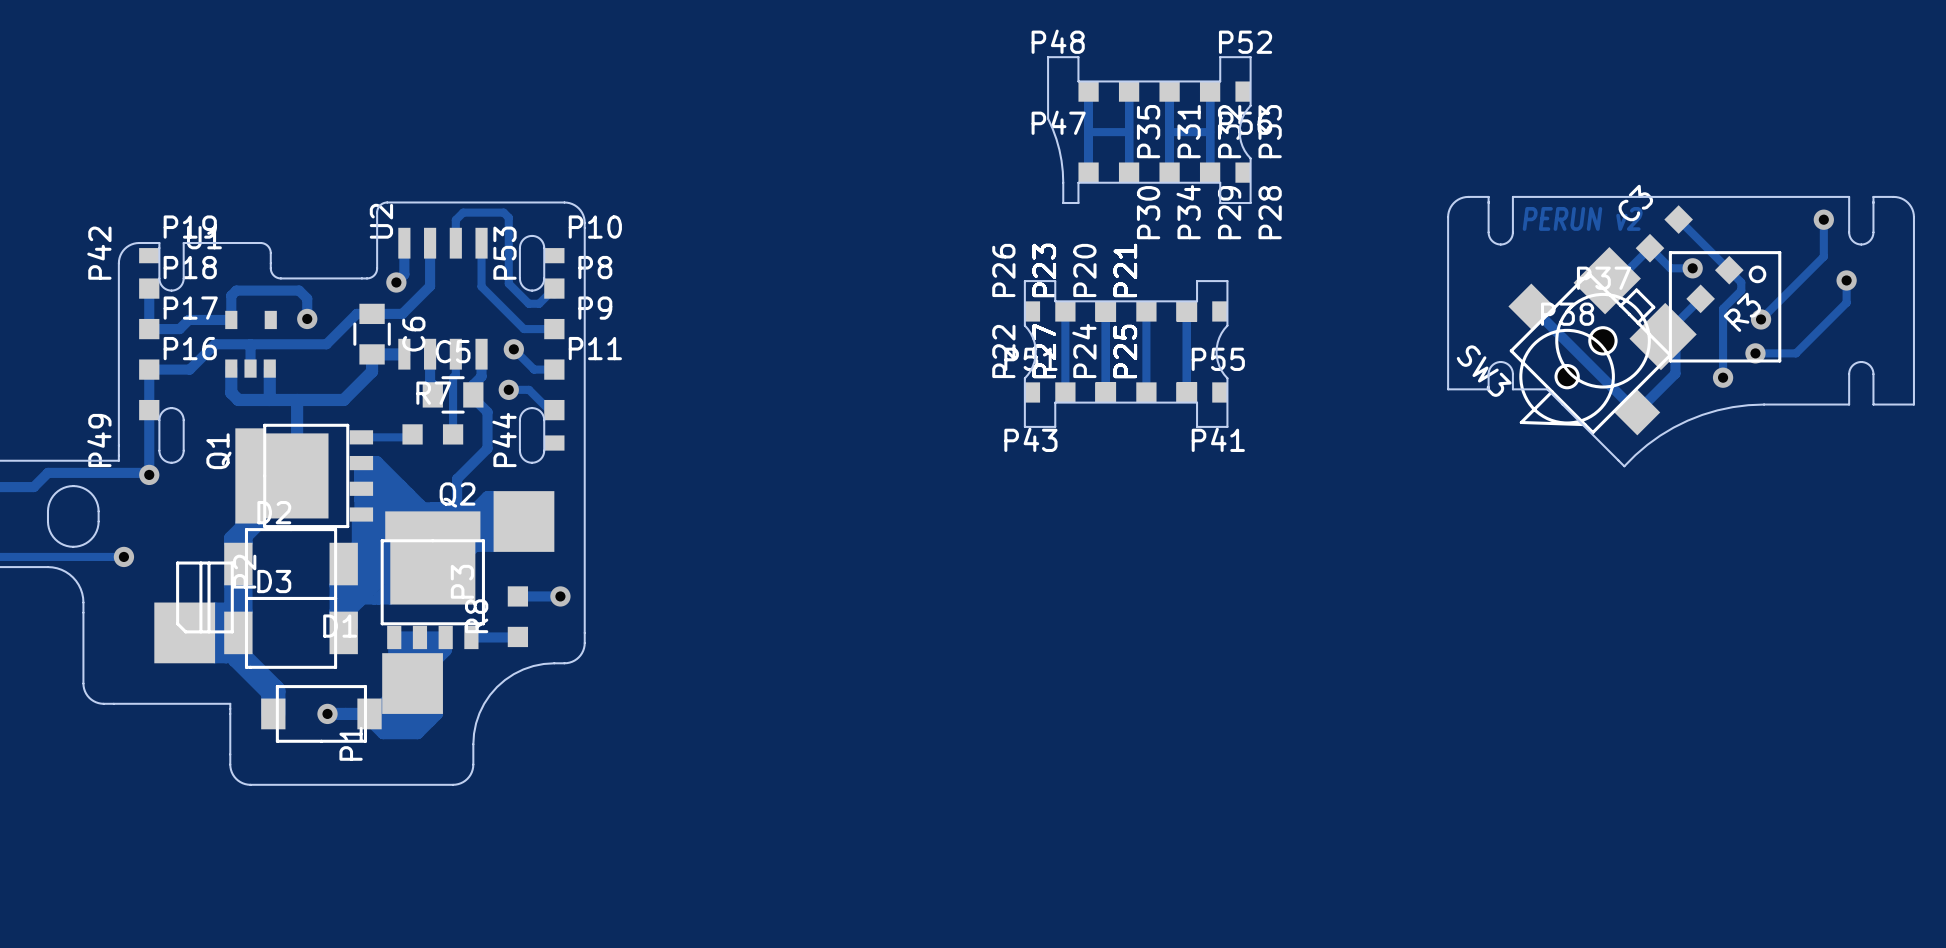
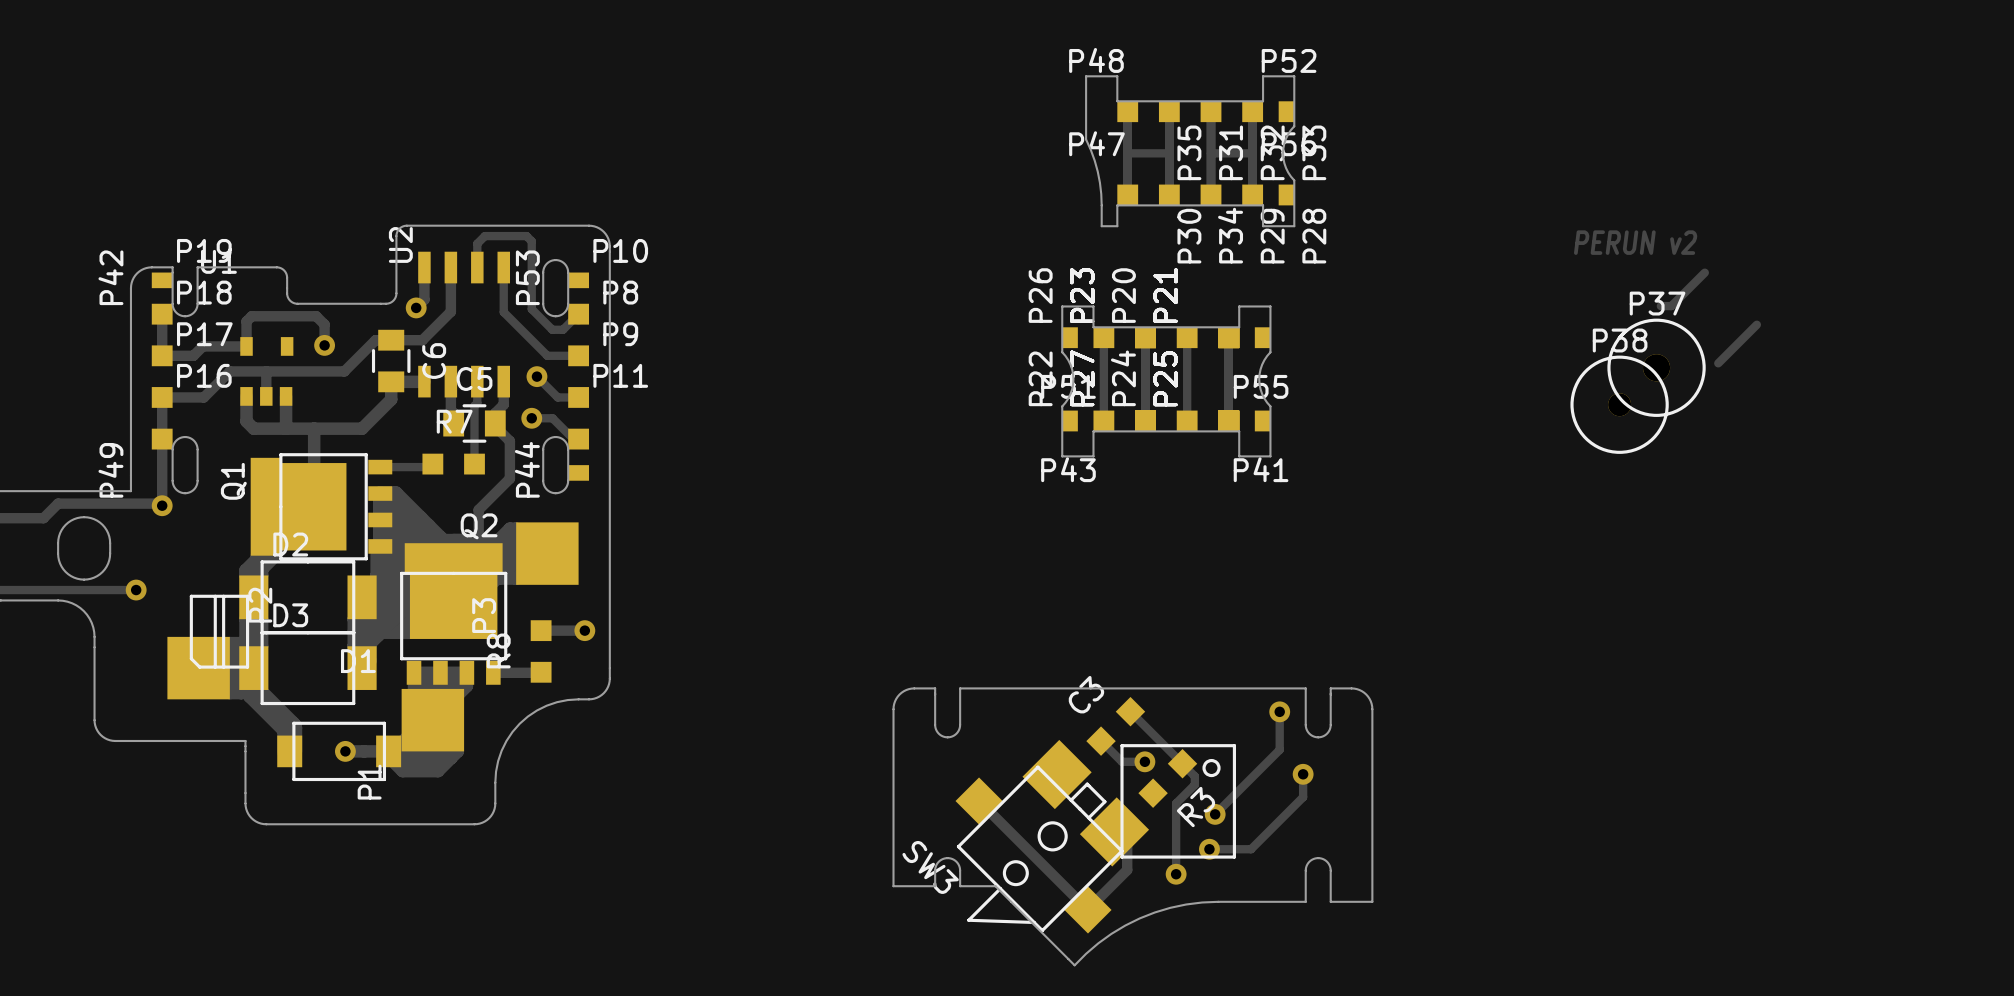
track: (1678, 219) (1729, 270) -> none
track: (1823, 219) (1823, 256) (1761, 319) -> none
via: (1823, 219) -> none
C3 position: (1664, 233) -> (1115, 726)
board edge: (1500, 244) (1508, 242) (1512, 235) (1512, 196) (1849, 196) (1849, 235) (1853, 242) (1861, 244) -> none
board edge: (1500, 244) (1493, 242) (1489, 235) (1488, 196) (1463, 197) (1452, 204) (1448, 217) (1448, 389) (1488, 389) (1490, 368) (1496, 362) (1505, 362) (1512, 371) (1512, 389) (1547, 389) (1624, 466) -> none
board edge: (1861, 244) (1868, 242) (1873, 235) (1873, 196) (1898, 197) (1909, 204) (1913, 217) (1913, 404) (1873, 404) (1872, 369) (1865, 362) (1858, 362) (1852, 365) (1849, 371) (1849, 404) (1748, 405) (1717, 410) (1673, 427) (1647, 444) (1624, 466) -> none
track: (1650, 248) (1670, 268) (1692, 268) -> none
via: (1692, 268) -> none
track: (1729, 270) (1741, 282) (1741, 290) (1723, 308) (1723, 377) -> none
track: (1846, 280) (1846, 302) (1795, 353) (1755, 353) -> none
via: (1846, 280) -> none
R3 position: (1714, 284) -> (1167, 778)
part: (1725, 306) -> none
track: (1532, 307) (1636, 411) (1675, 373) (1675, 348) (1663, 336) -> none
via: (1761, 319) -> none
SW3 position: (1602, 341) -> (1052, 836)
via: (1755, 353) -> none
via: (1723, 377) -> none
track: none -> (1130, 711) (1182, 763)
track: none -> (1279, 711) (1279, 749) (1215, 814)
via: none -> (1279, 711)
board edge: none -> (947, 737) (955, 734) (959, 728) (960, 688) (1305, 688) (1306, 728) (1310, 734) (1318, 737)
board edge: none -> (947, 737) (940, 734) (935, 728) (935, 688) (908, 689) (897, 696) (893, 709) (893, 886) (935, 886) (936, 864) (942, 859) (952, 859) (959, 867) (960, 886) (995, 886) (1074, 965)
board edge: none -> (1318, 737) (1325, 734) (1330, 728) (1330, 688) (1356, 689) (1368, 696) (1372, 709) (1372, 901) (1330, 901) (1329, 865) (1323, 859) (1315, 858) (1309, 861) (1306, 867) (1305, 901) (1202, 902) (1170, 907) (1125, 925) (1098, 943) (1074, 965)
track: none -> (1101, 741) (1122, 761) (1144, 761)
via: none -> (1144, 761)
track: none -> (1182, 764) (1194, 776) (1194, 784) (1176, 803) (1176, 874)
track: none -> (1303, 774) (1303, 797) (1251, 849) (1209, 849)
via: none -> (1303, 774)
track: none -> (979, 801) (1087, 909) (1127, 870) (1127, 844) (1114, 831)
part: none -> (1178, 801)
via: none -> (1215, 814)
via: none -> (1209, 849)
via: none -> (1176, 874)

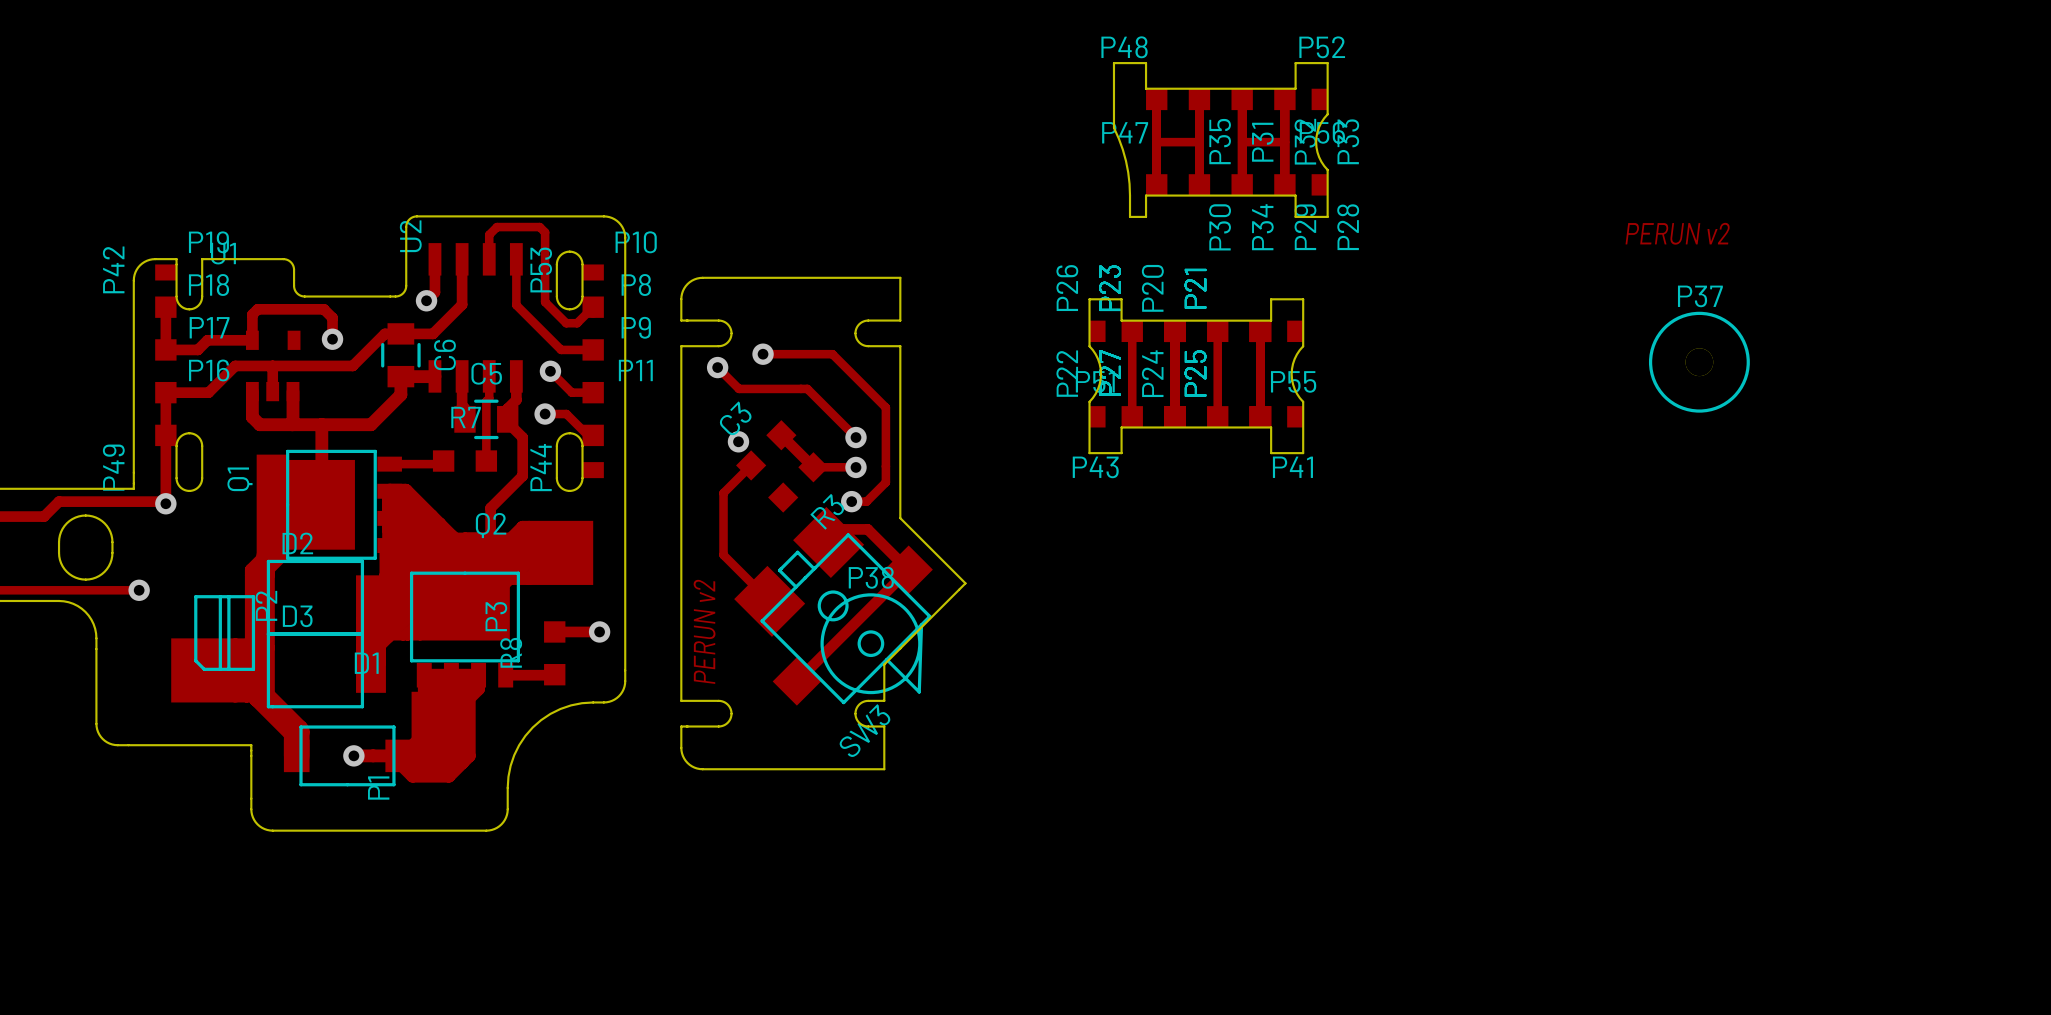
track: (1704, 272) (1671, 306) (1660, 306) -> none
track: (1756, 324) (1718, 363) -> none
board edge: none -> (855, 333) (858, 341) (864, 345) (900, 346) (900, 518) (965, 583) (884, 664) (884, 700) (868, 700)
board edge: none -> (855, 333) (858, 325) (864, 320) (900, 320) (900, 277) (702, 277) (694, 279) (685, 286) (682, 293) (681, 320) (718, 320) (726, 323) (731, 330) (730, 338) (725, 344) (718, 346)
board edge: none -> (718, 346) (681, 346) (681, 700) (722, 701) (728, 705) (731, 713)
track: none -> (763, 354) (832, 354) (885, 407) (885, 482) (866, 501) (851, 501)
via: none -> (763, 354)
track: none -> (717, 367) (739, 388) (807, 388) (855, 437)
via: none -> (717, 367)
P38 position: (1619, 404) -> (870, 643)
track: none -> (781, 435) (813, 467) (855, 467)
via: none -> (855, 437)
via: none -> (738, 441)
track: none -> (751, 465) (723, 493) (723, 555) (769, 601)
via: none -> (855, 467)
via: none -> (851, 501)
track: none -> (828, 537) (828, 542) (841, 529) (867, 529) (907, 570) (797, 680)
text: none -> PERUN v2 (704, 631)
board edge: none -> (868, 700) (858, 705) (855, 717) (859, 722) (864, 726) (884, 726) (884, 769) (702, 769) (689, 764) (682, 753) (681, 726) (722, 726) (728, 721) (731, 713)
track: (1130, 711) (1182, 763) -> none
track: (1279, 711) (1279, 749) (1215, 814) -> none
via: (1279, 711) -> none
C3 position: (1115, 726) -> (766, 450)
board edge: (947, 737) (955, 734) (959, 728) (960, 688) (1305, 688) (1306, 728) (1310, 734) (1318, 737) -> none
board edge: (947, 737) (940, 734) (935, 728) (935, 688) (908, 689) (897, 696) (893, 709) (893, 886) (935, 886) (936, 864) (942, 859) (952, 859) (959, 867) (960, 886) (995, 886) (1074, 965) -> none
board edge: (1318, 737) (1325, 734) (1330, 728) (1330, 688) (1356, 689) (1368, 696) (1372, 709) (1372, 901) (1330, 901) (1329, 865) (1323, 859) (1315, 858) (1309, 861) (1306, 867) (1305, 901) (1202, 902) (1170, 907) (1125, 925) (1098, 943) (1074, 965) -> none
track: (1101, 741) (1122, 761) (1144, 761) -> none
via: (1144, 761) -> none
track: (1182, 764) (1194, 776) (1194, 784) (1176, 803) (1176, 874) -> none
track: (1303, 774) (1303, 797) (1251, 849) (1209, 849) -> none
via: (1303, 774) -> none
R3 position: (1167, 778) -> (798, 482)
track: (979, 801) (1087, 909) (1127, 870) (1127, 844) (1114, 831) -> none
part: (1178, 801) -> none
via: (1215, 814) -> none
SW3 rotation: 0° (1052, 836) -> 90° counterclockwise (833, 606)
SW3 position: (1052, 836) -> (833, 606)
via: (1209, 849) -> none
via: (1176, 874) -> none

